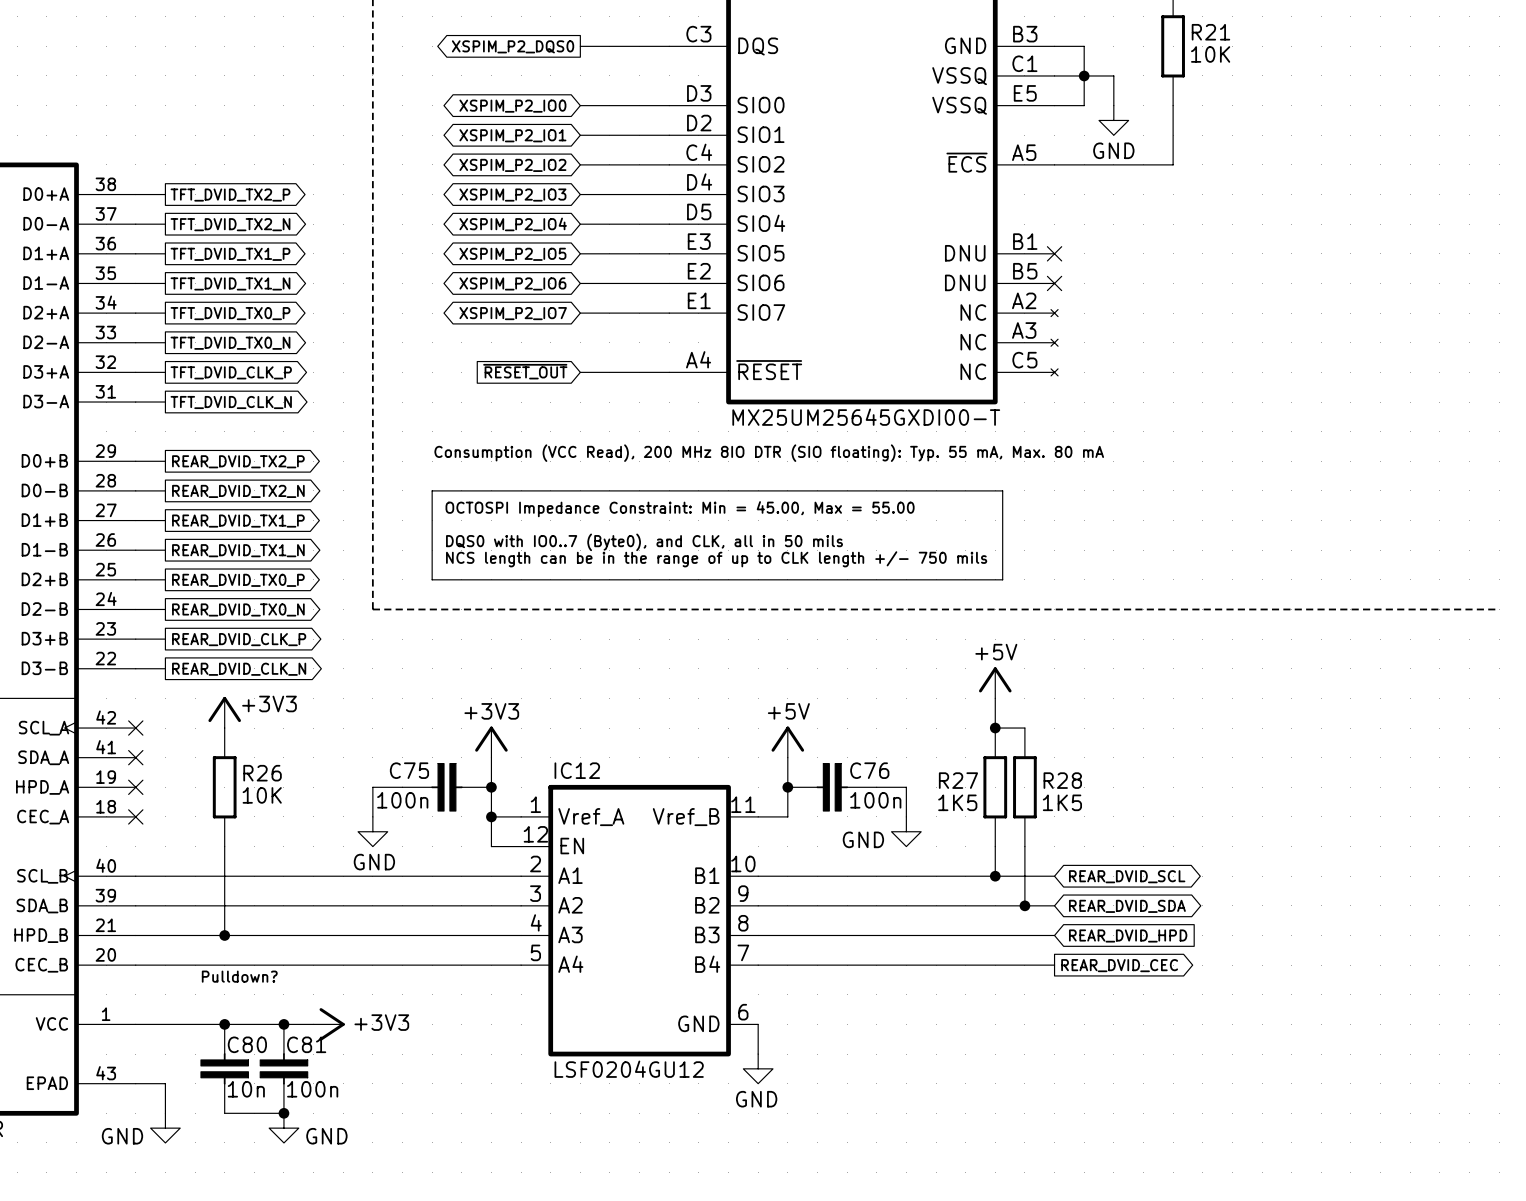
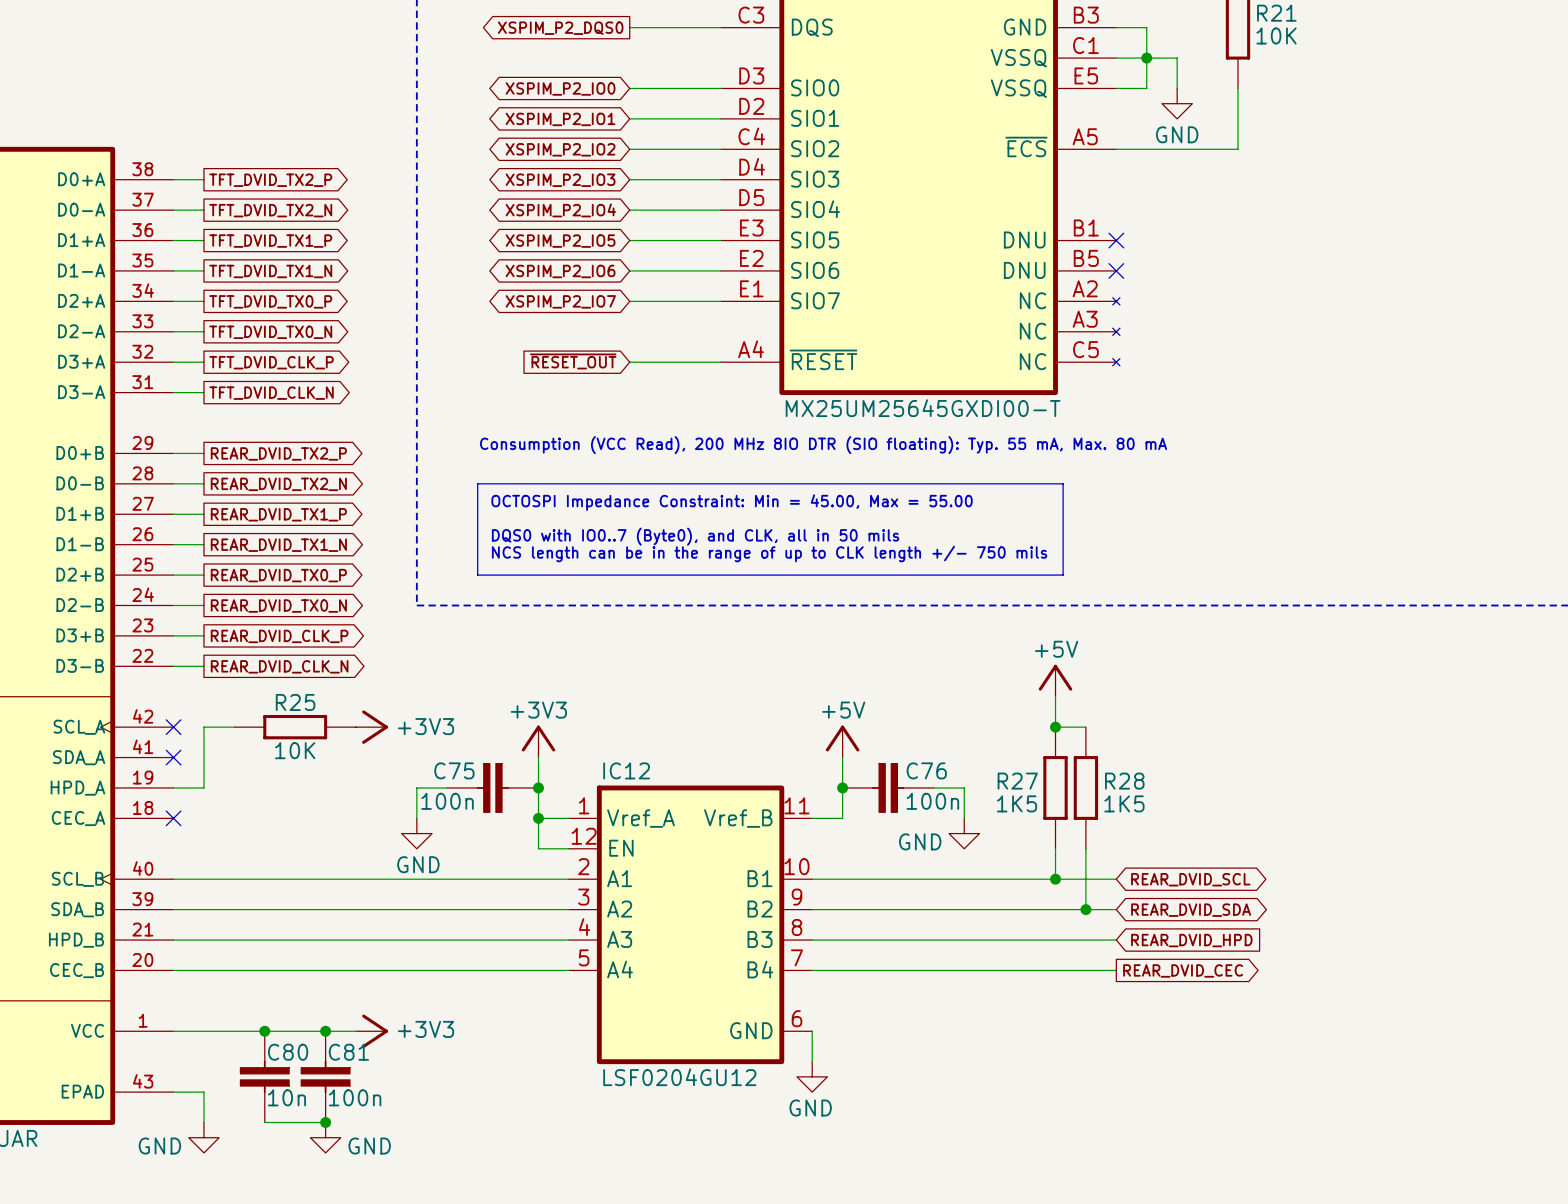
power symbol rotation: 0° (224, 709) -> 90° clockwise (375, 727)
power symbol position: +3V3 (224, 712) -> +3V3 (371, 727)
wire: none -> (234, 727) (203, 727) (203, 787) (173, 787)
R25: none -> 10K (295, 727)
no-connect mark: (135, 787) -> none
R26: 10K (224, 787) -> none
wire: (224, 846) (224, 935) -> none
junction: (224, 935) -> none
text: Pulldown? (239, 976) -> none

